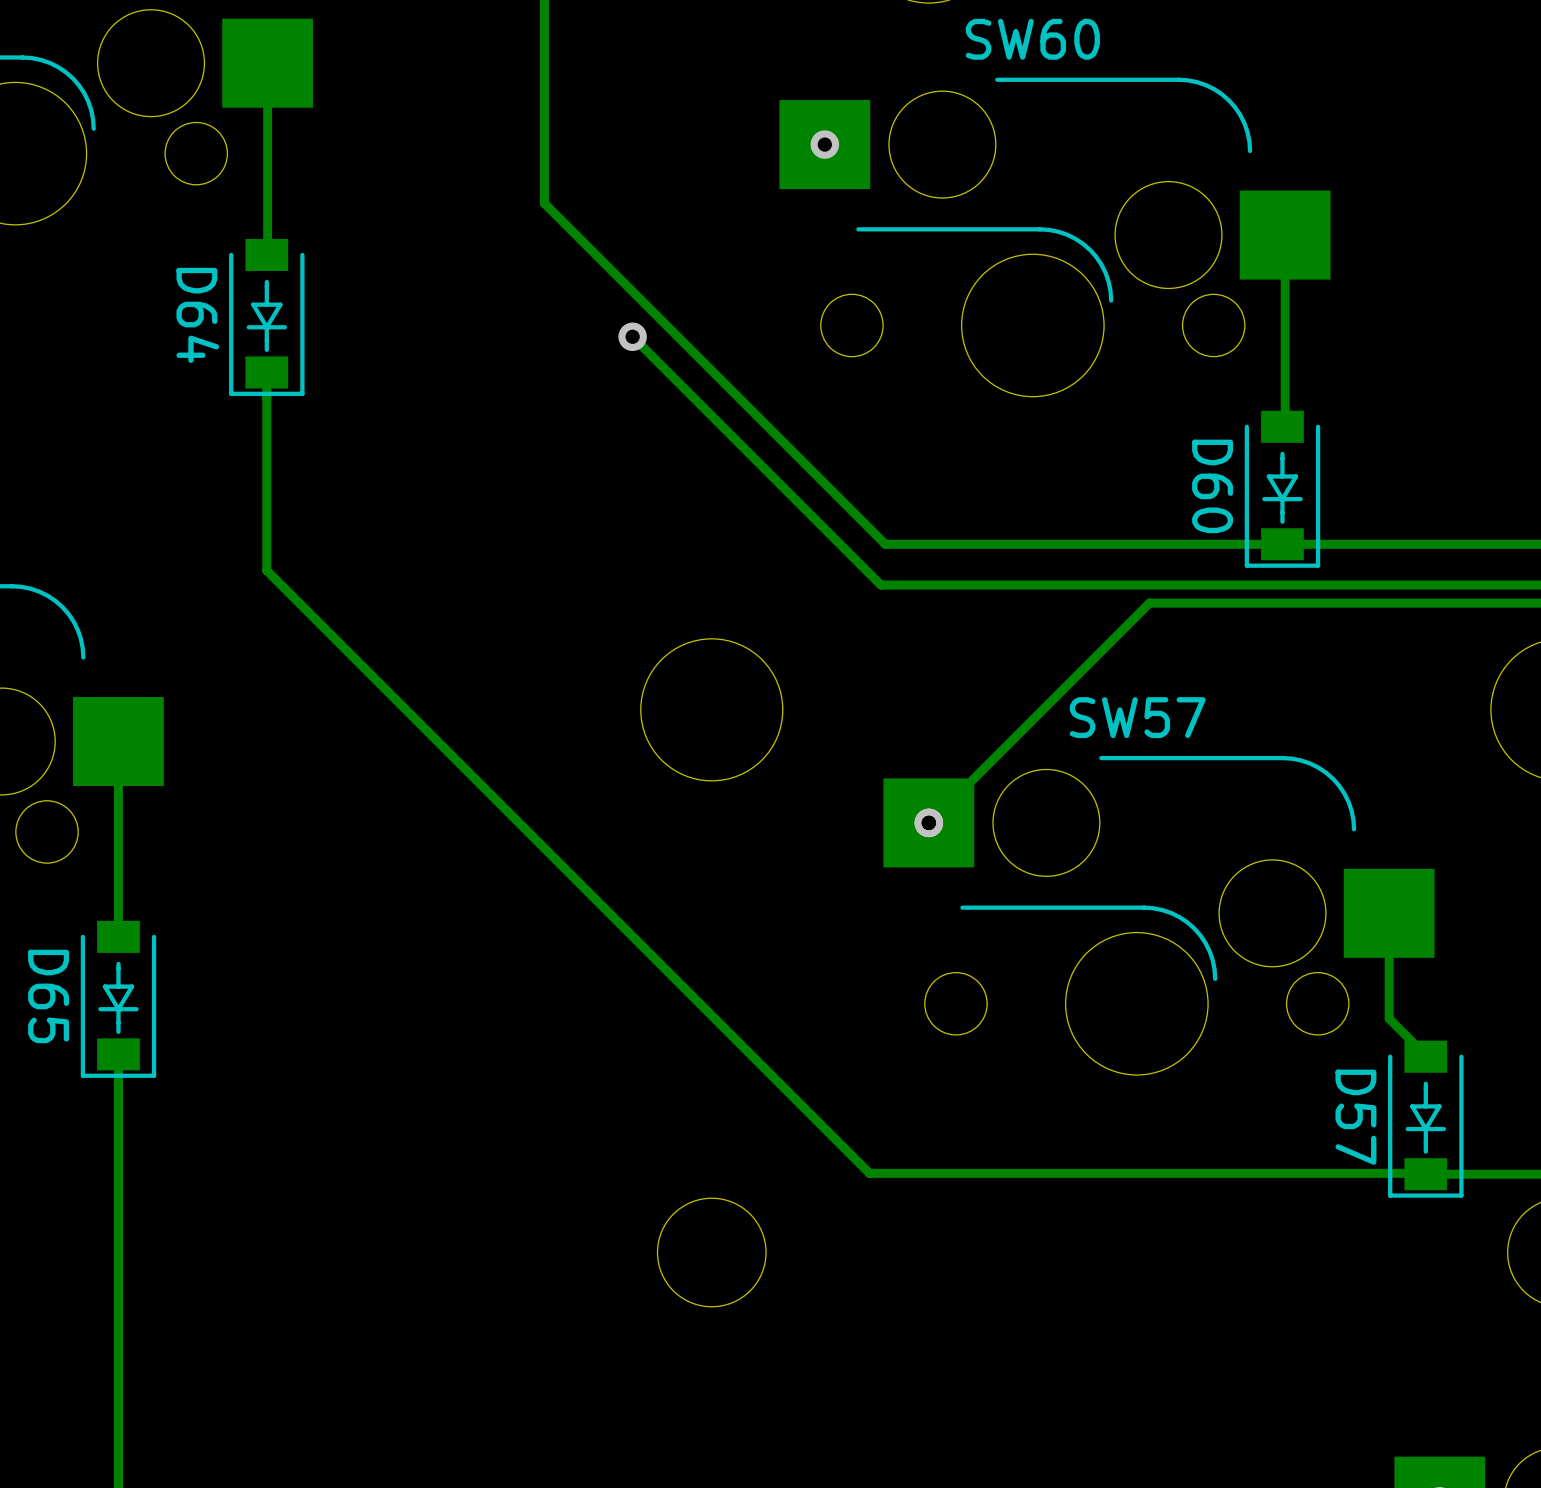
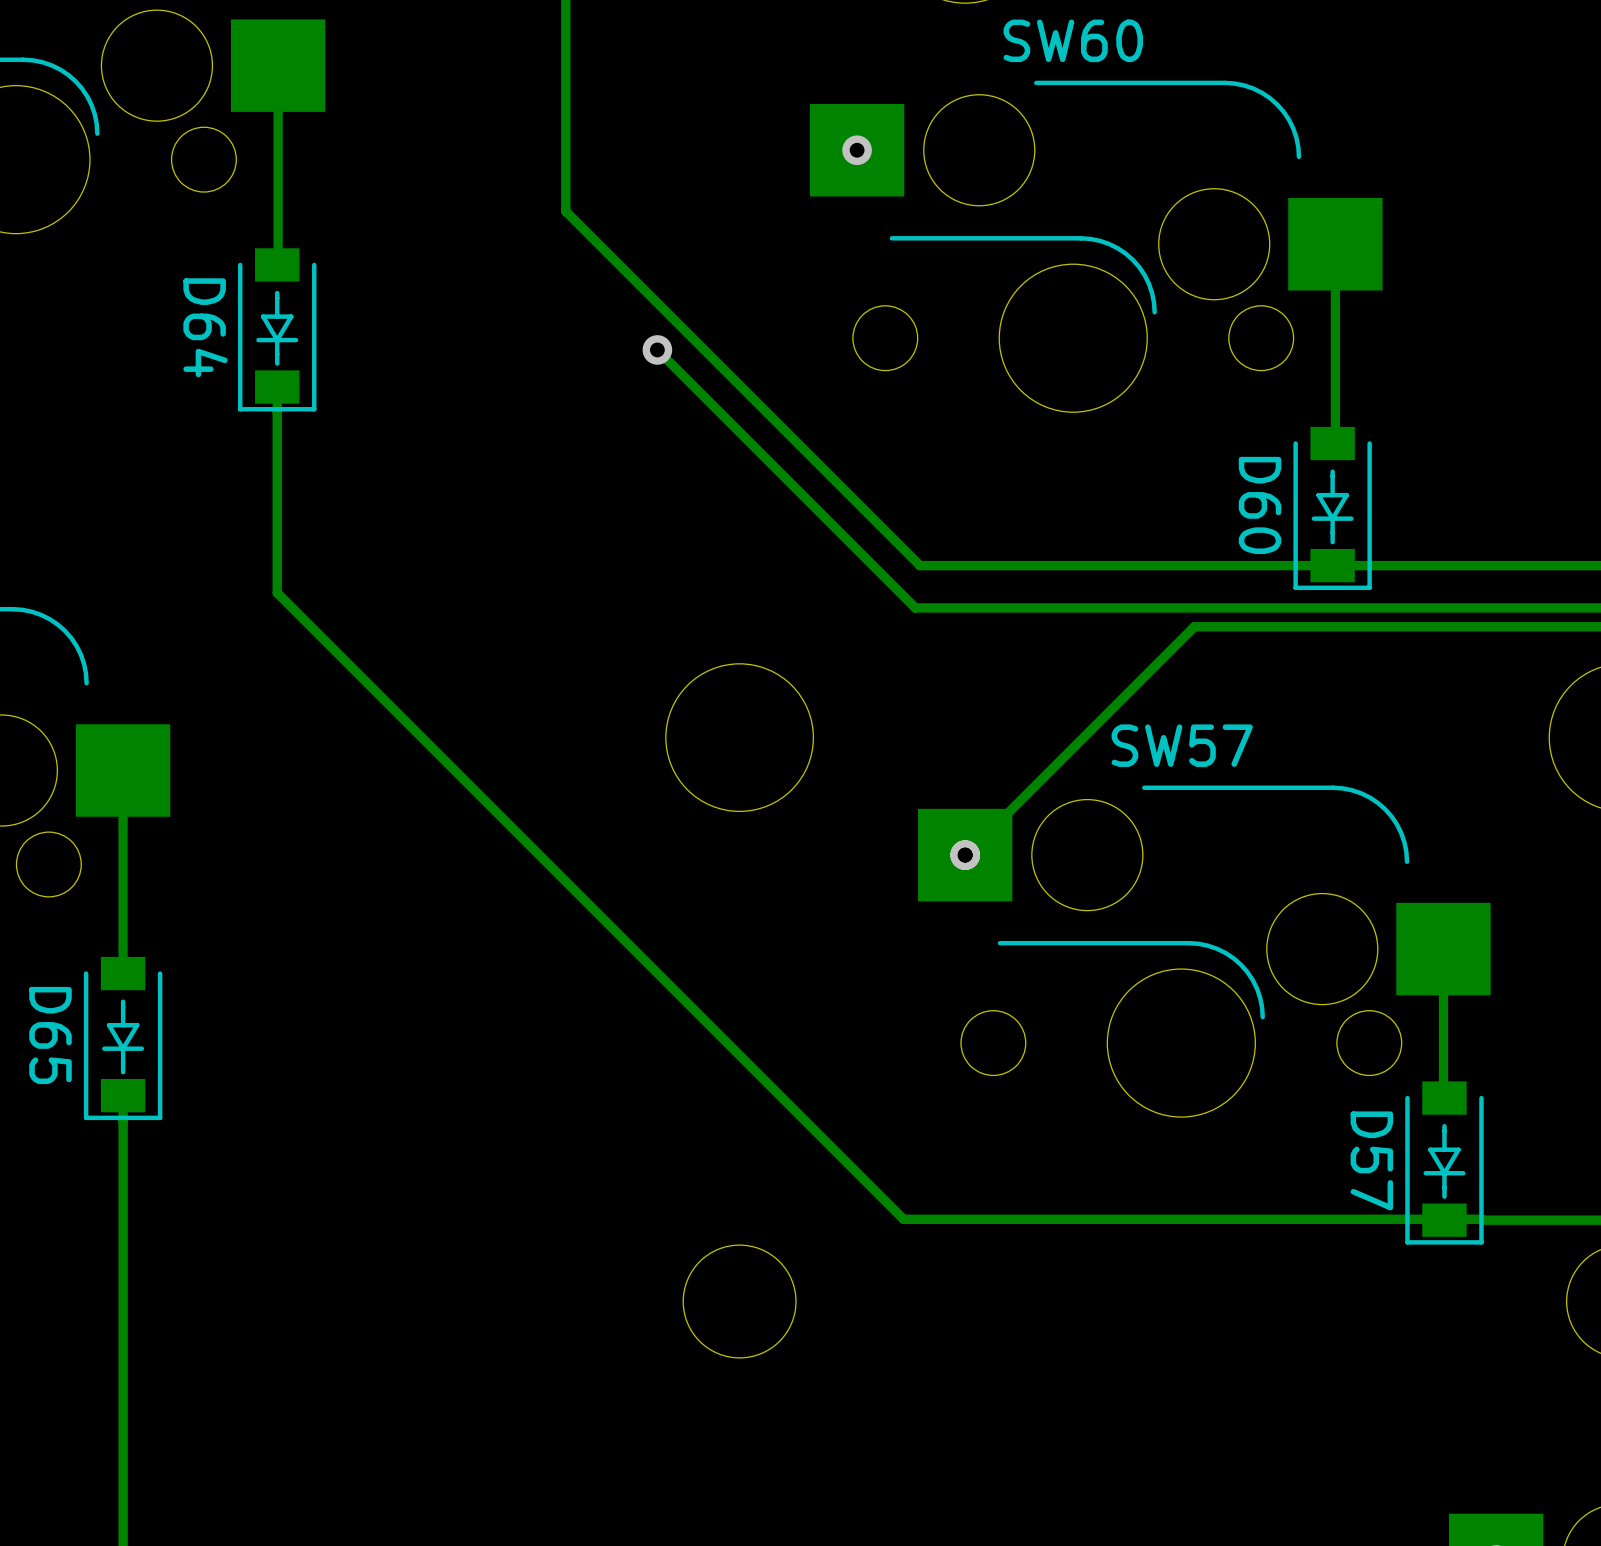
track: (1389, 1018) (1426, 1055) -> (1443, 1058) (1444, 1099)
D57 position: (1425, 1119) -> (1444, 1163)

